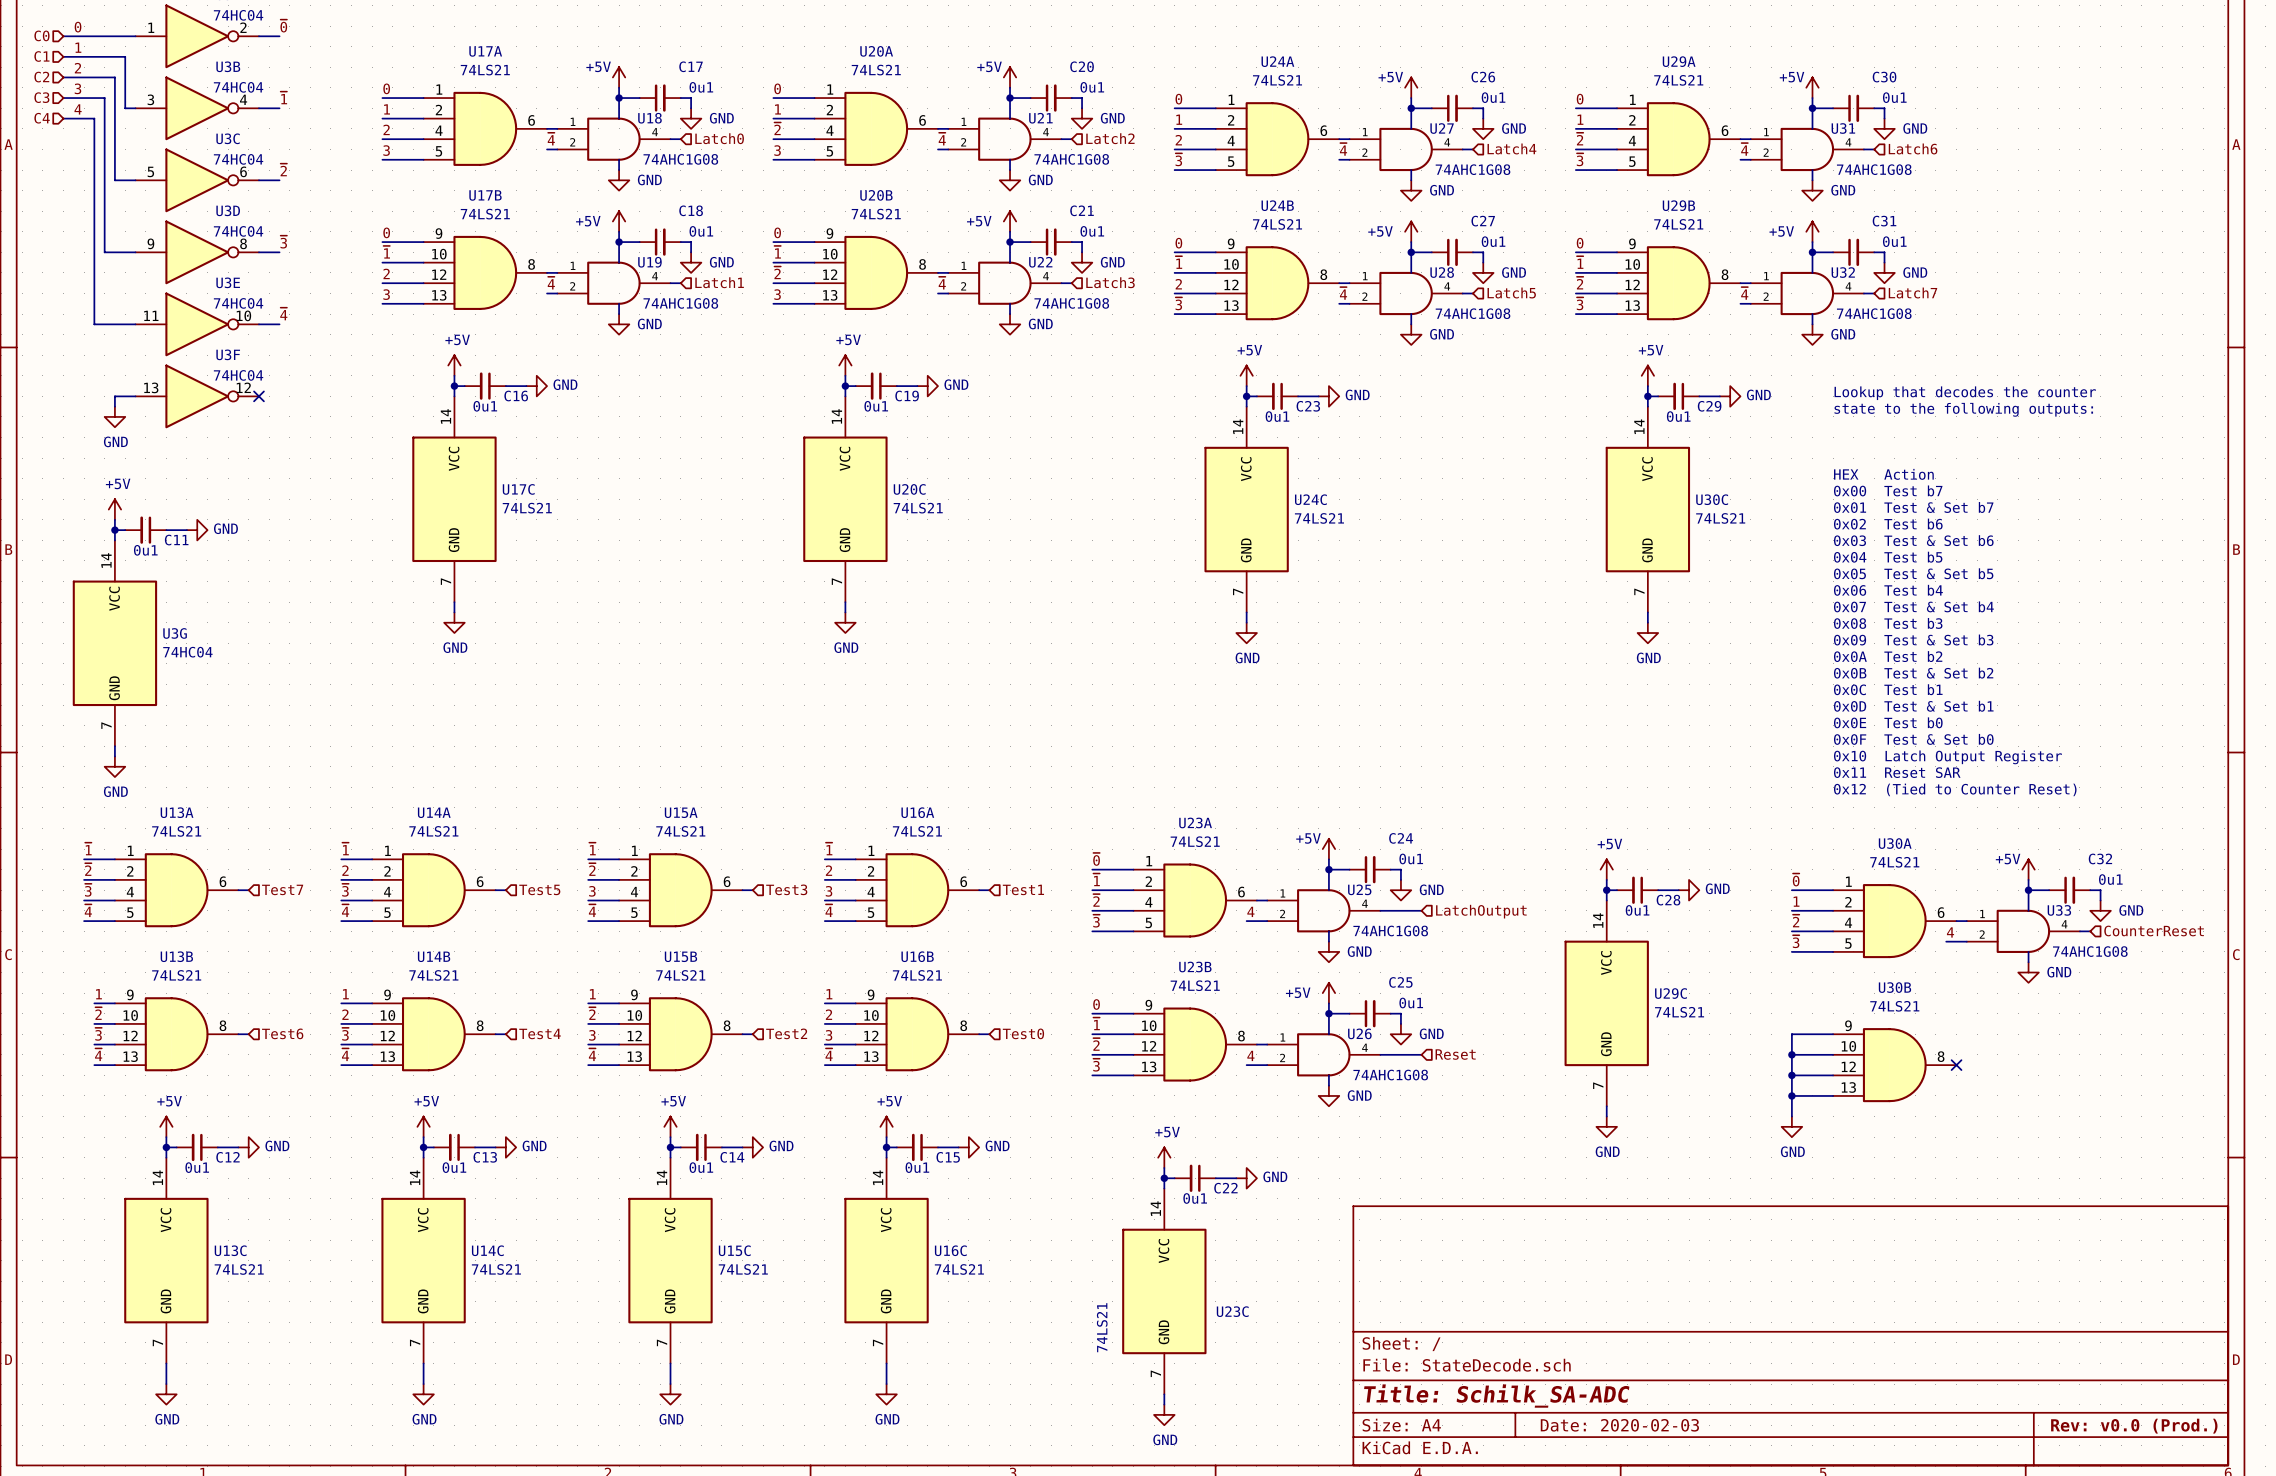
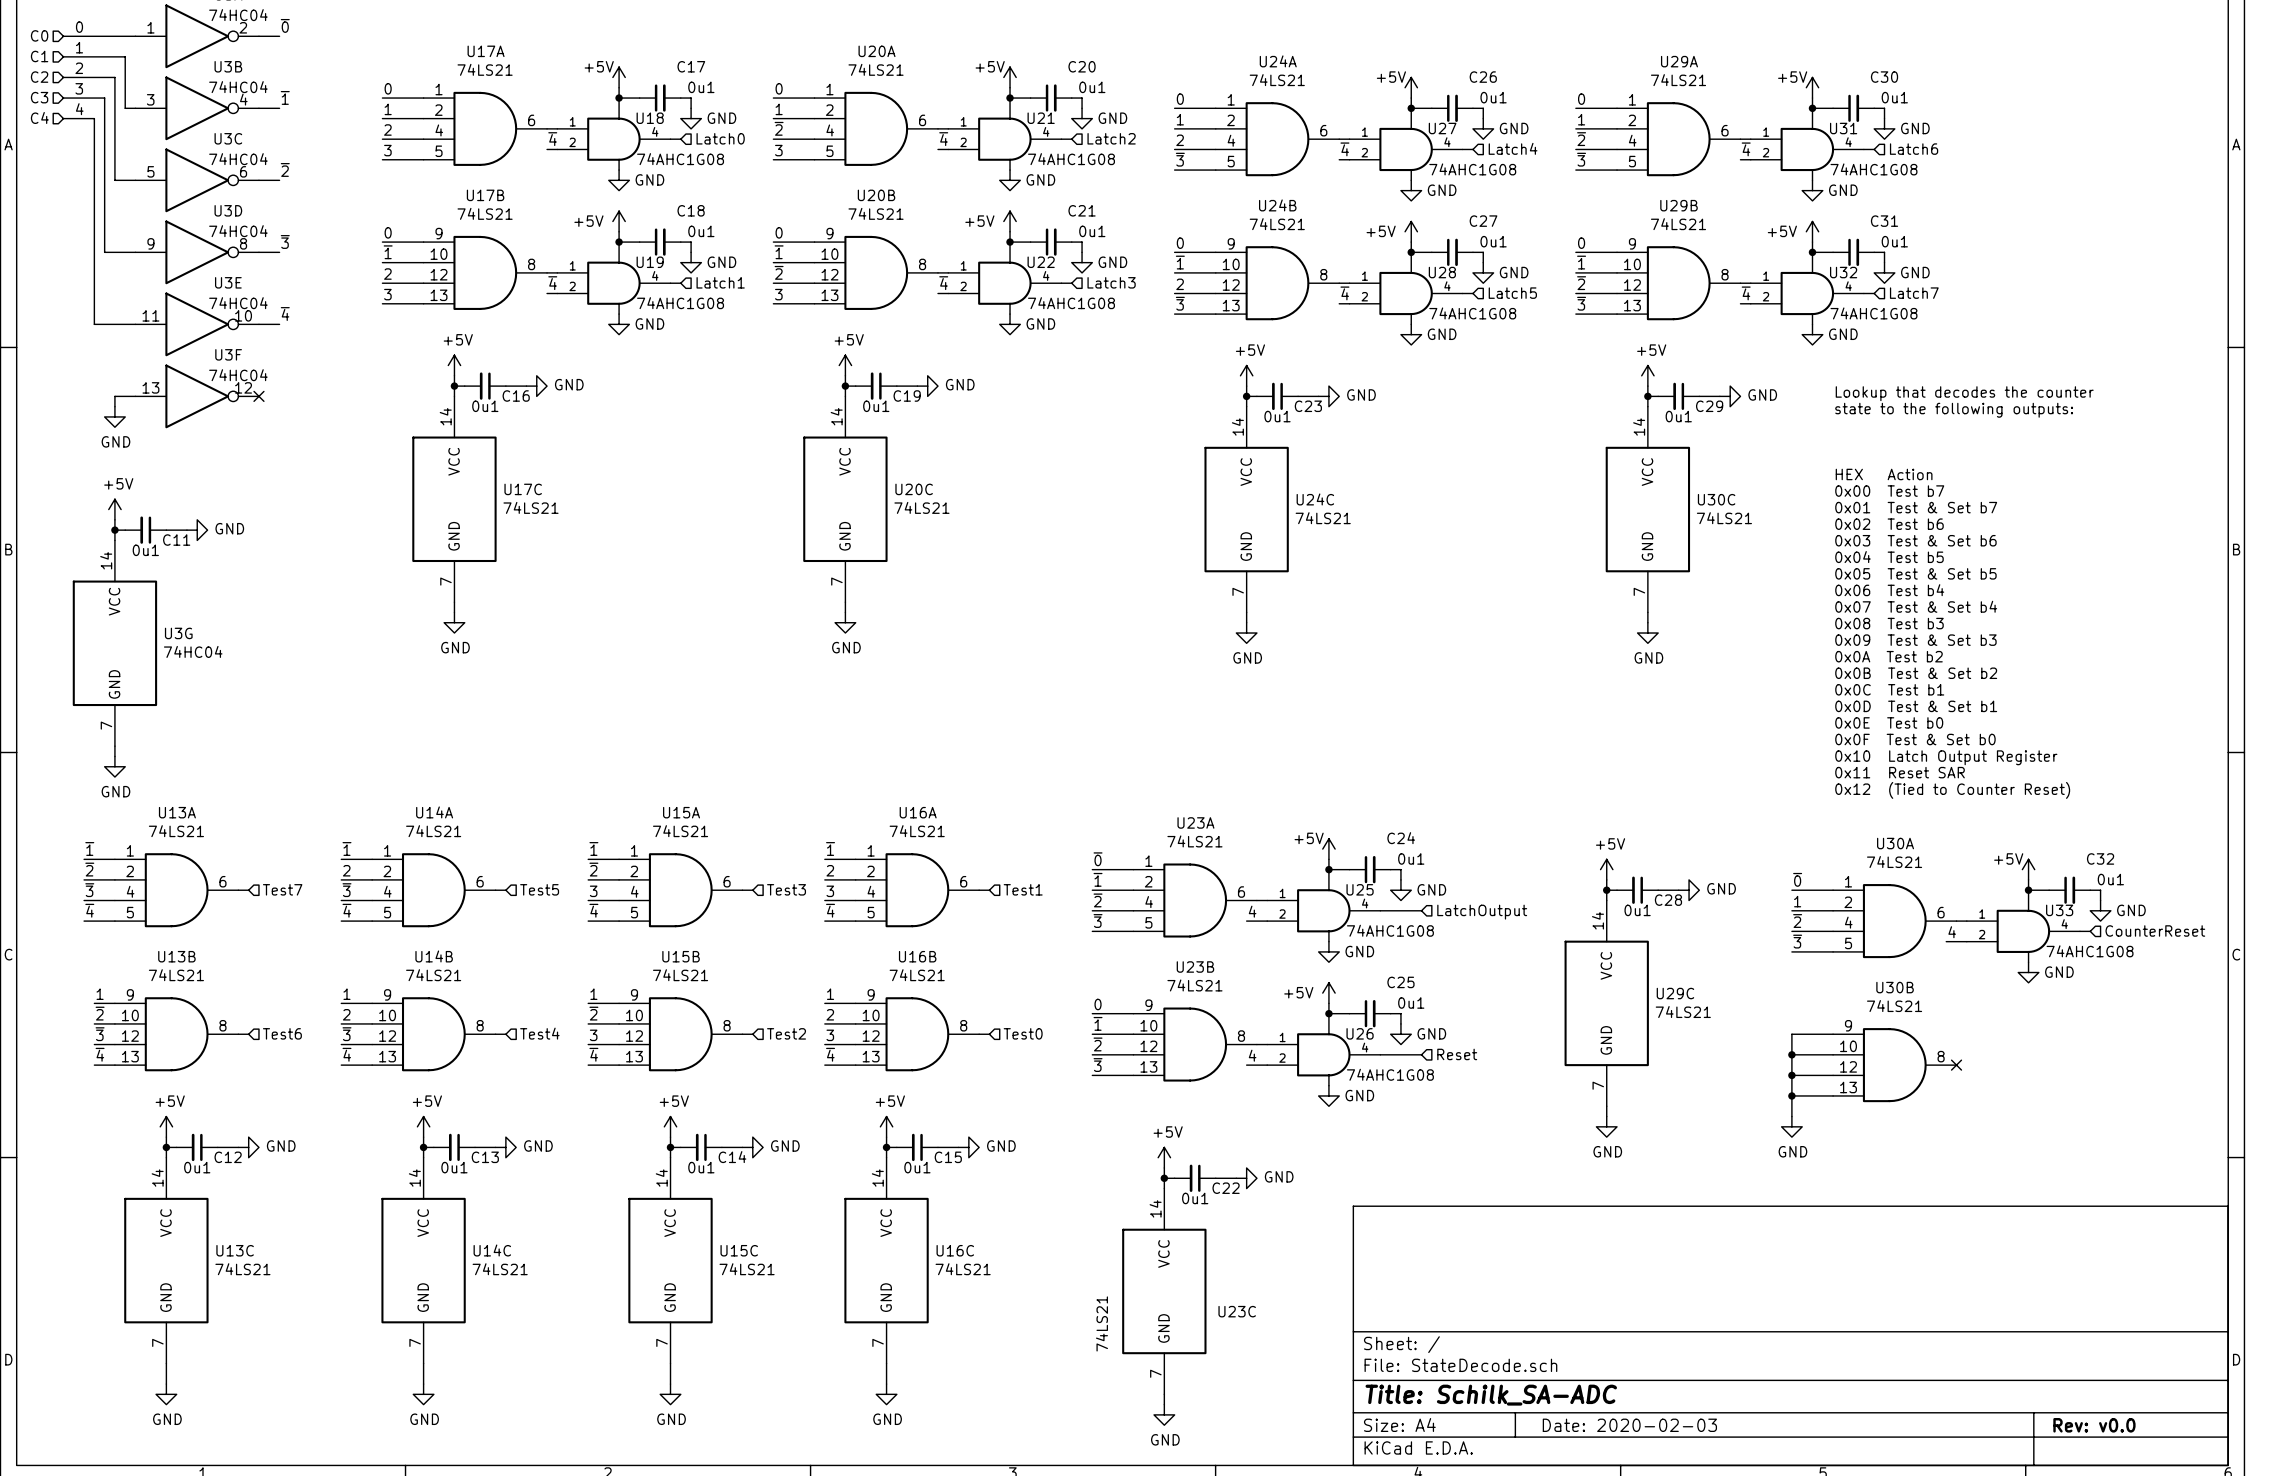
title block: Rev: v0.0 (Prod.) (2134, 1426) -> Rev: v0.0 (2094, 1425)

